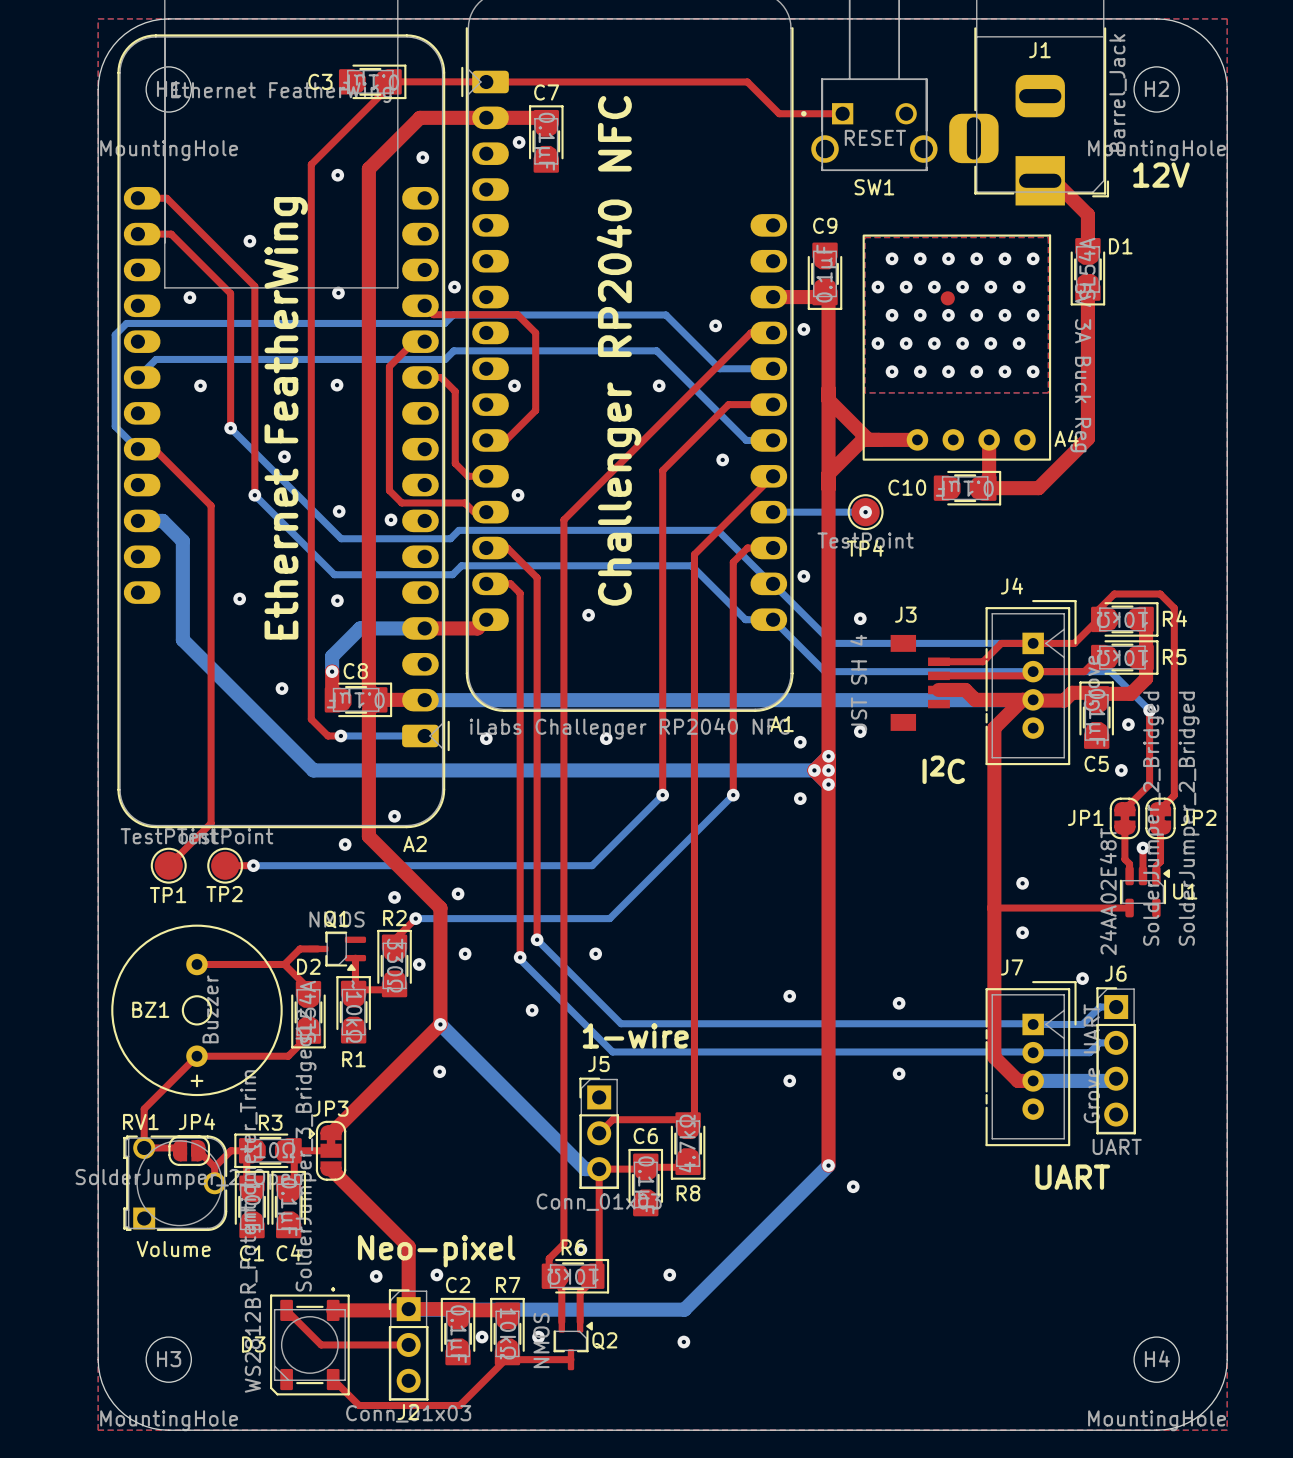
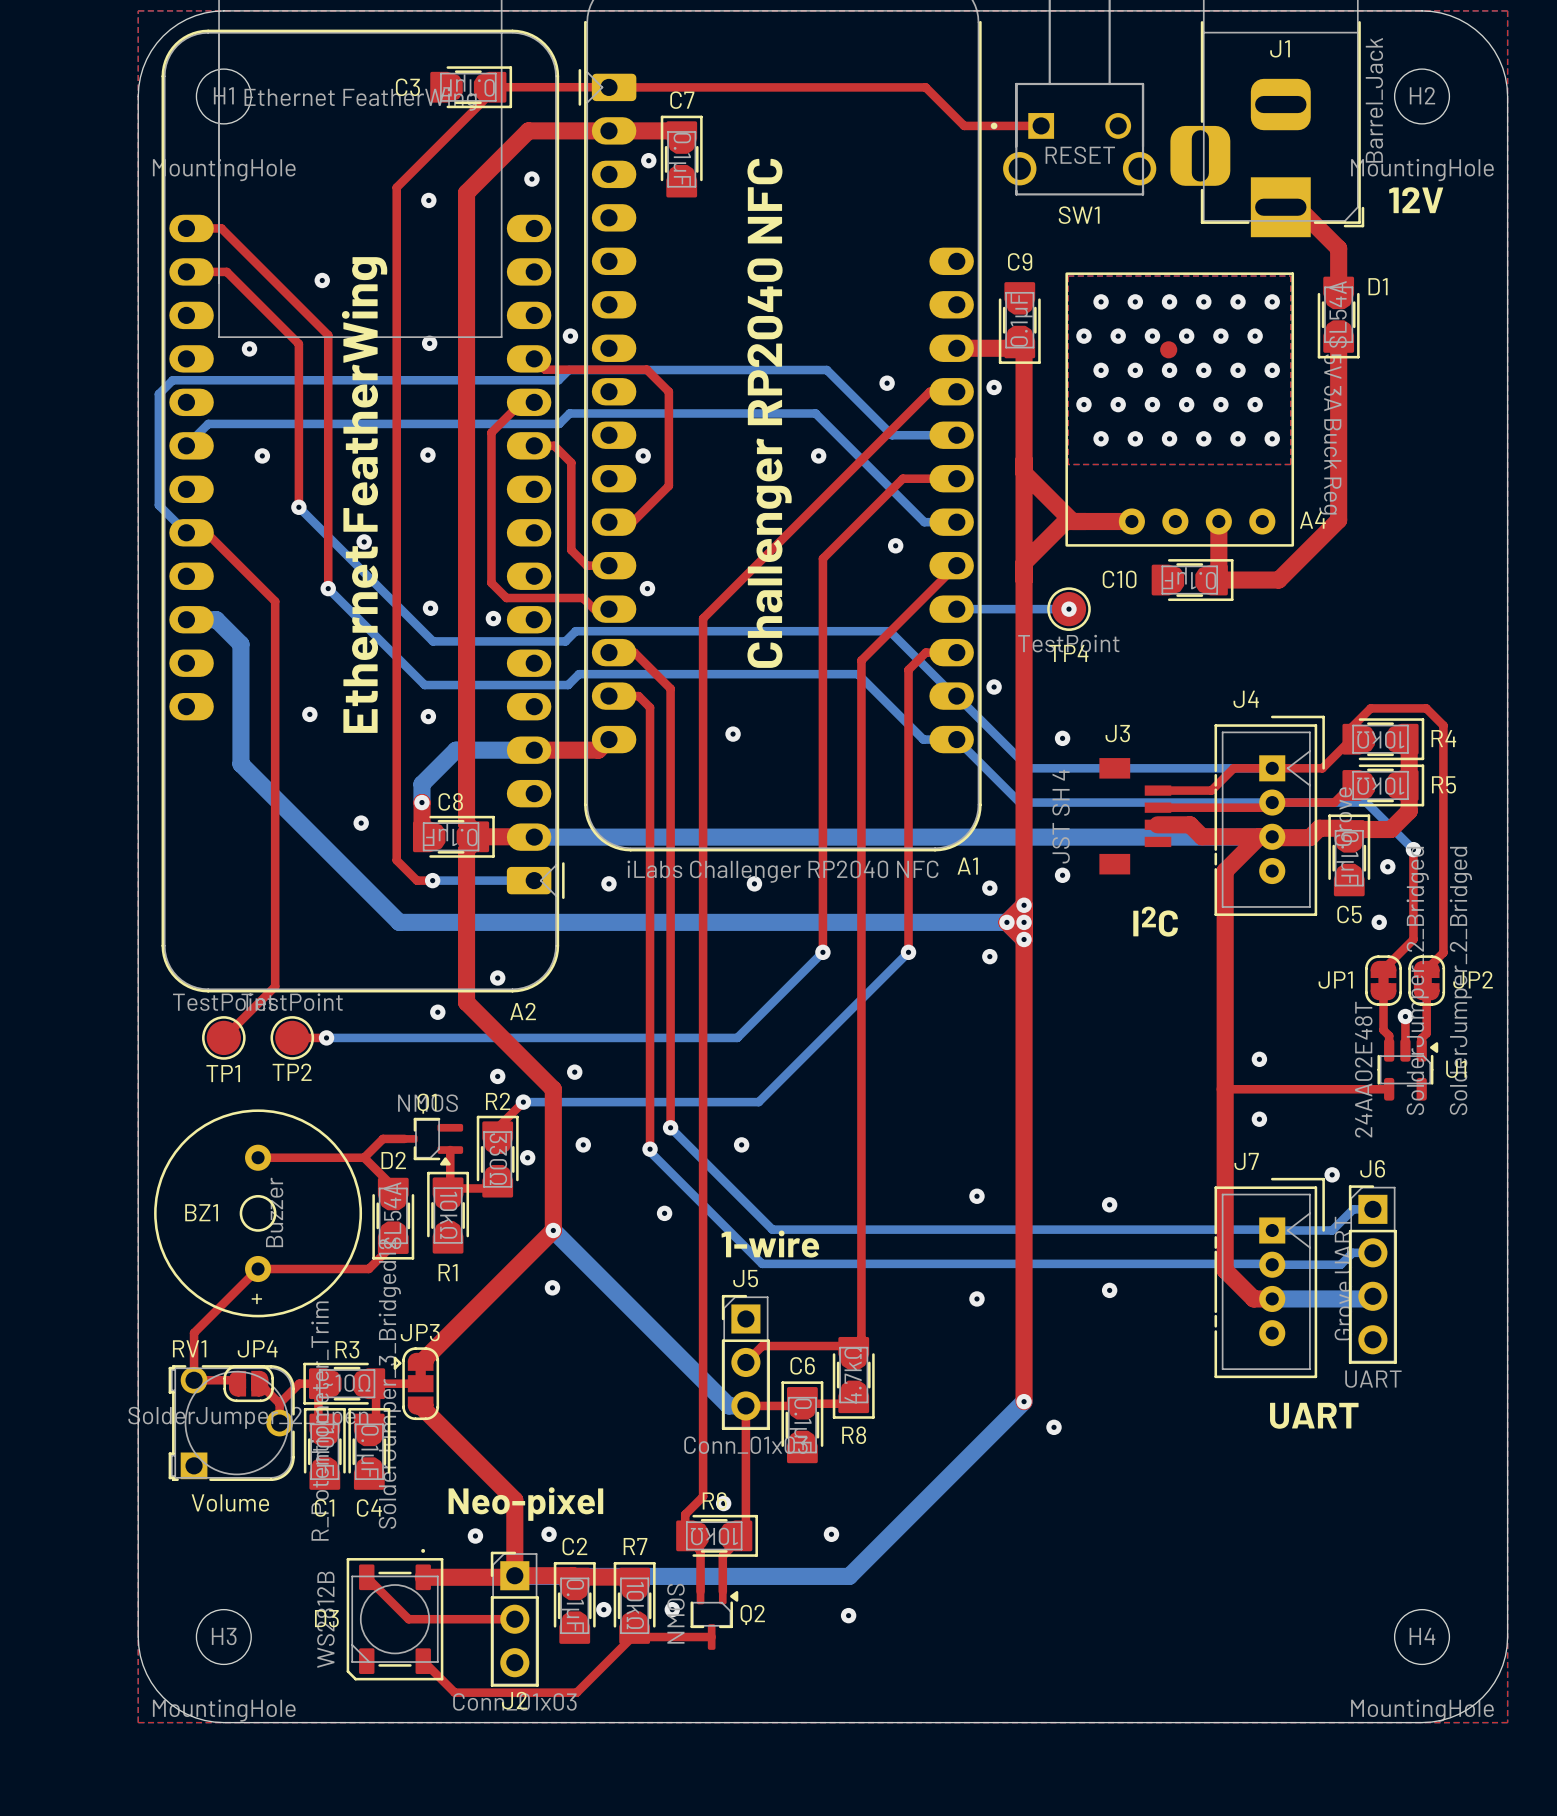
R1 value: ~10kΩ (354, 1011) -> 10kΩ (448, 1215)

